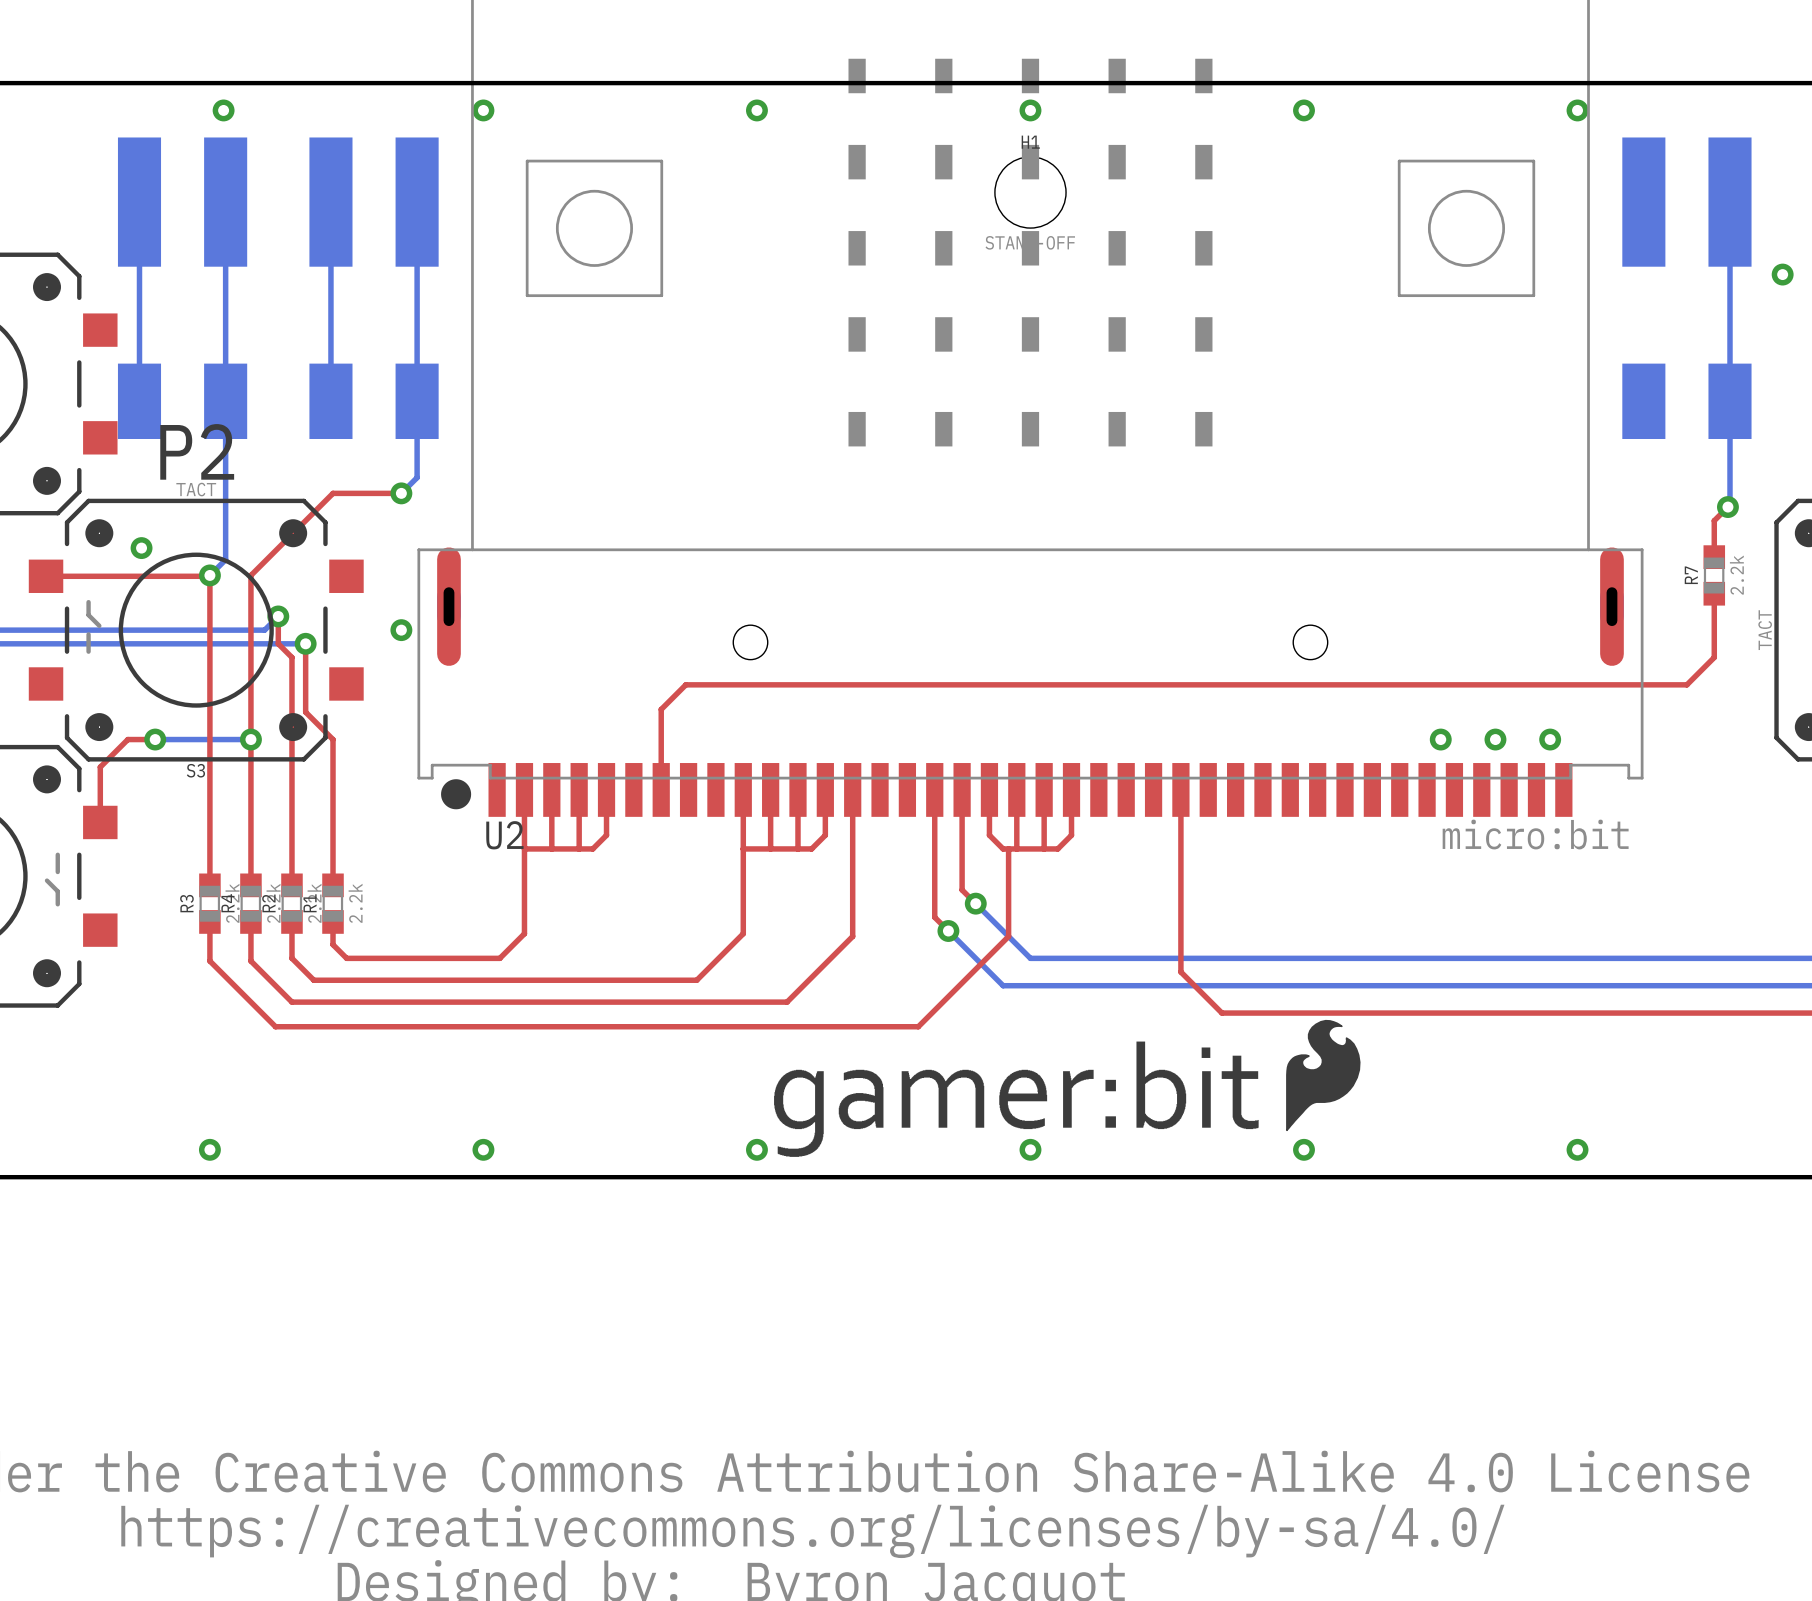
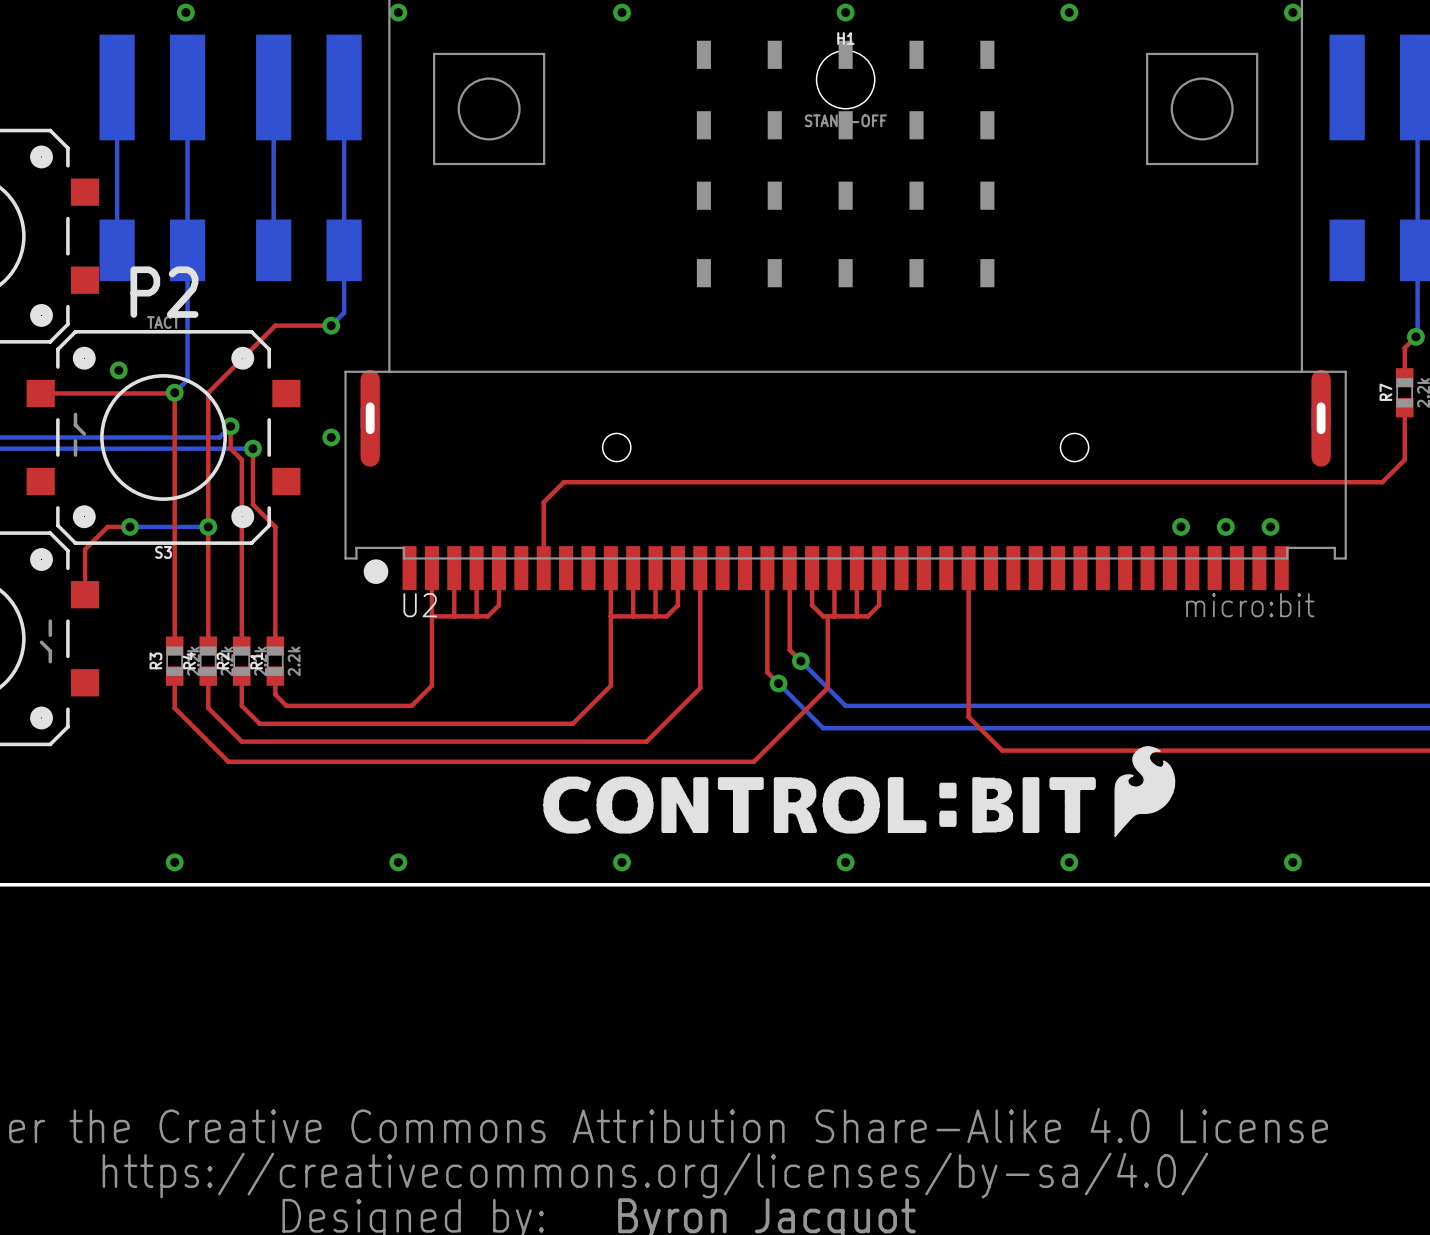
drawing: [774, 1041, 1259, 1157] -> none
drawing: none -> [542, 776, 1096, 834]
drawing position: (1323, 1075) -> (1144, 791)

